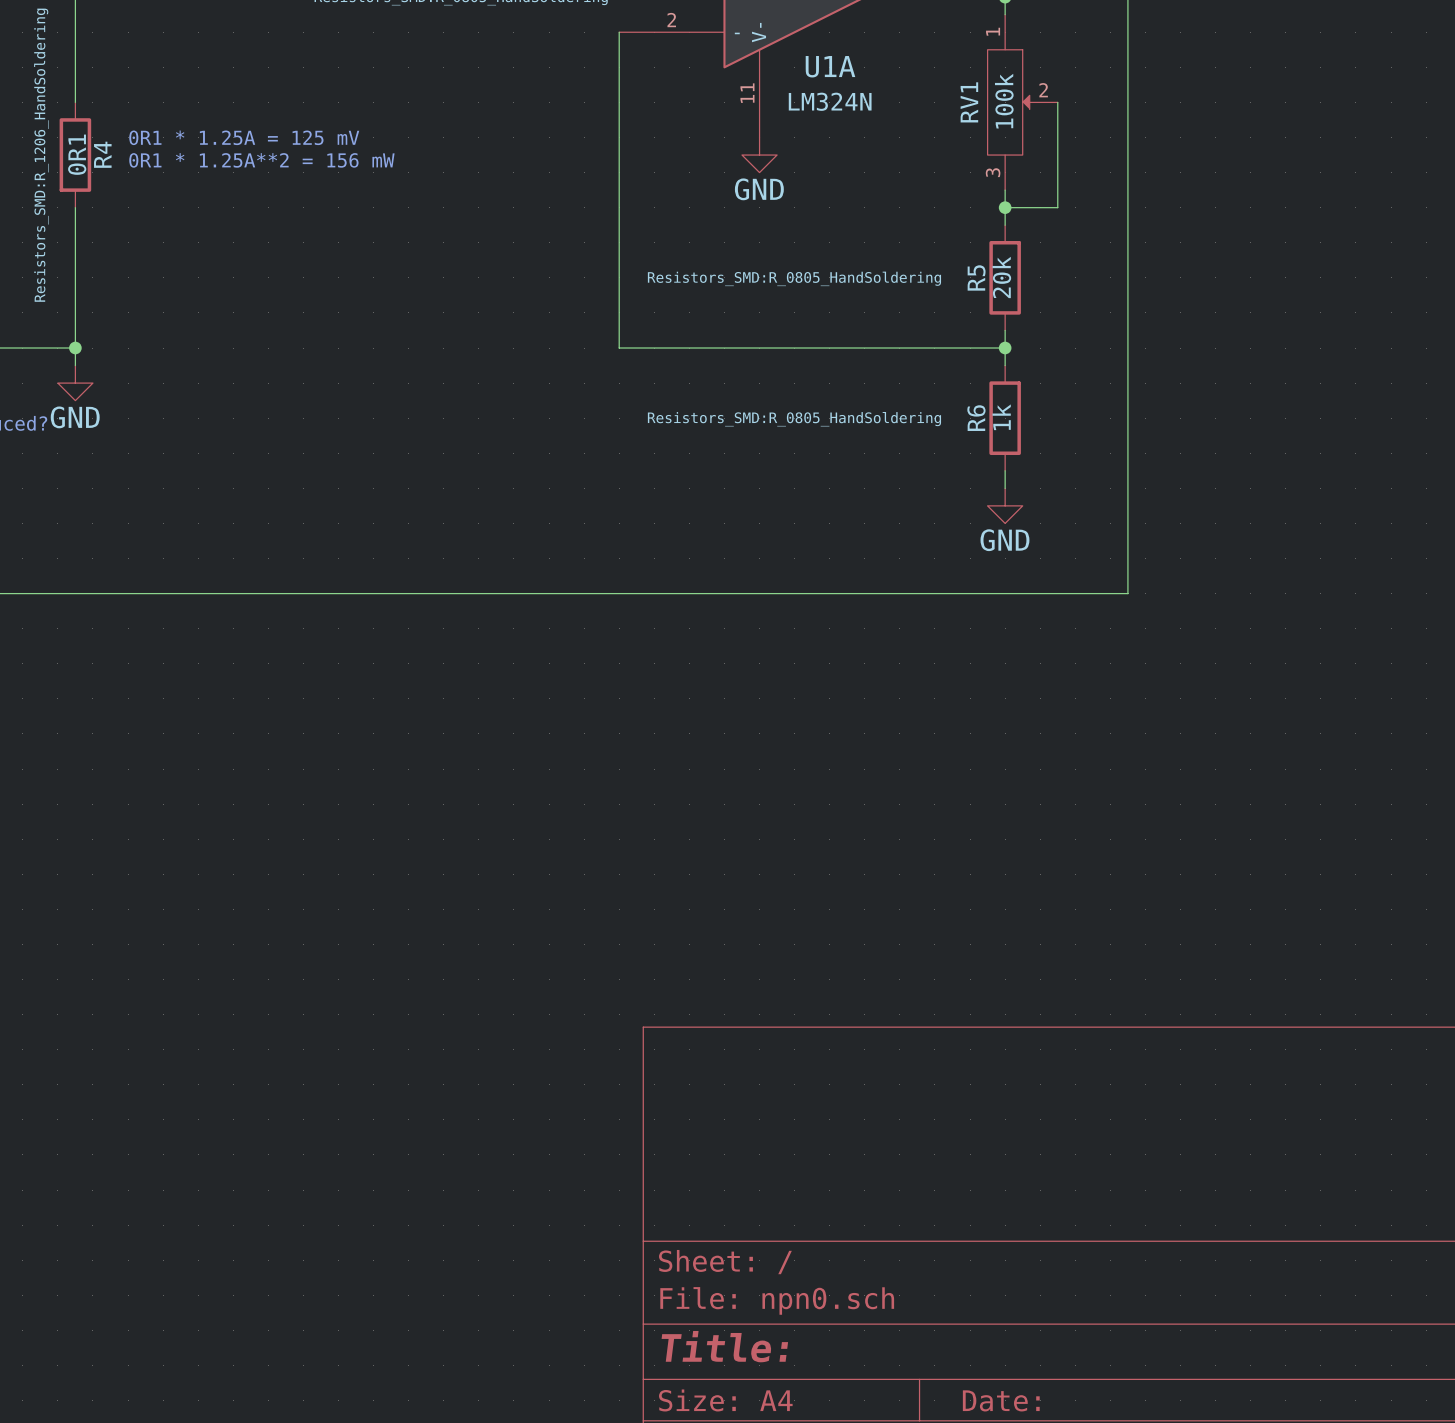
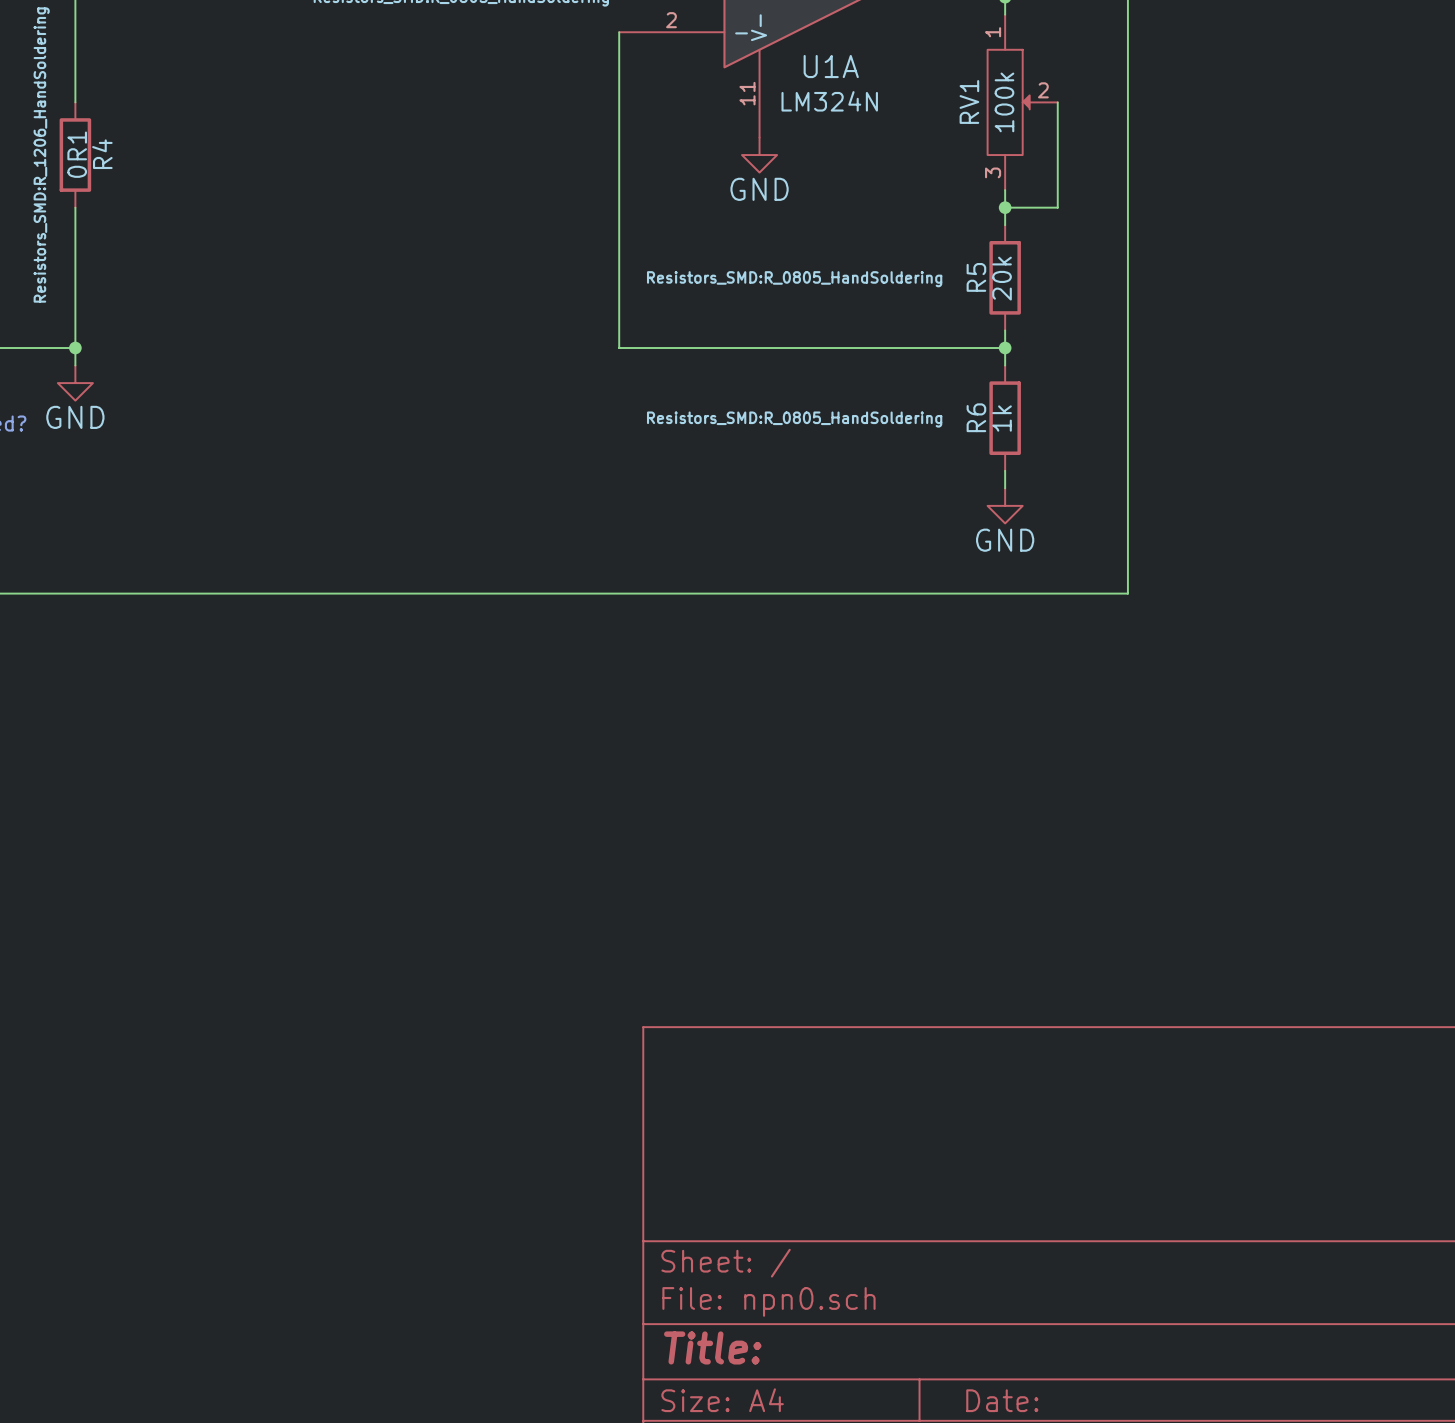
text: 0R1 * 1.25A = 125 mV (244, 137) -> none
text: 0R1 * 1.25A**2 = 156 mW (261, 160) -> none

